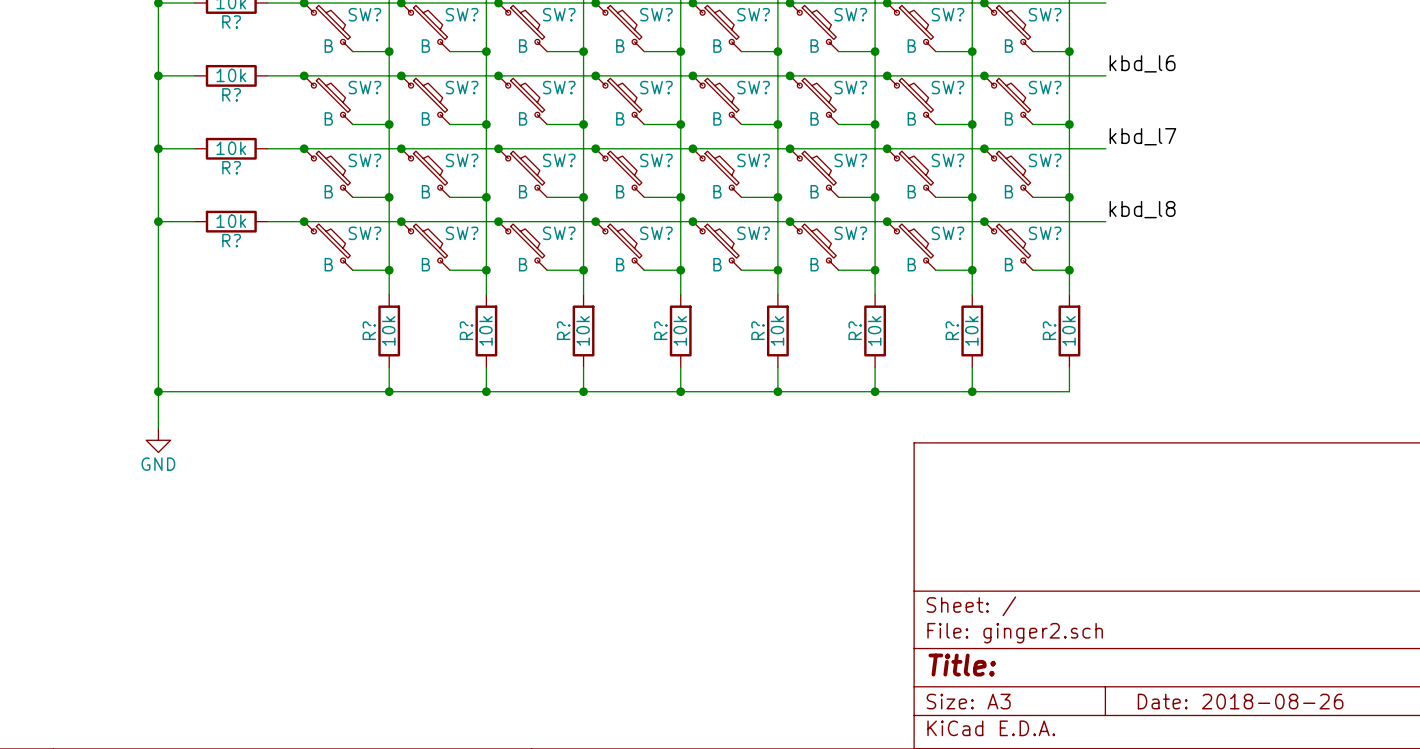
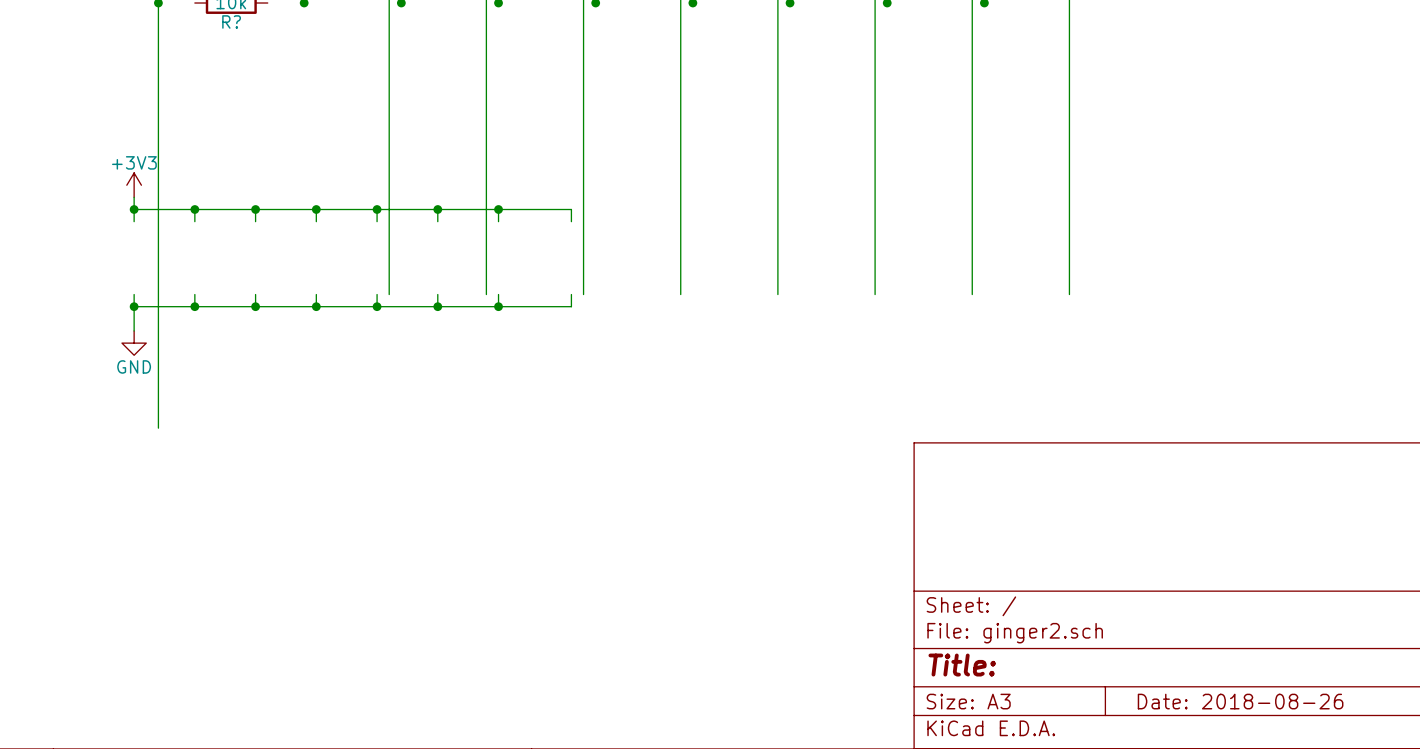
wire: (158, 3) (194, 3) -> none
wire: (267, 3) (1105, 3) -> none
SW?: B (328, 27) -> none
SW?: B (425, 27) -> none
SW?: B (522, 27) -> none
SW?: B (620, 27) -> none
SW?: B (717, 27) -> none
SW?: B (814, 27) -> none
SW?: B (911, 27) -> none
SW?: B (1008, 27) -> none
wire: (352, 51) (389, 51) -> none
junction: (389, 51) -> none
wire: (449, 51) (486, 51) -> none
junction: (486, 51) -> none
wire: (547, 51) (583, 51) -> none
junction: (583, 51) -> none
wire: (644, 51) (680, 51) -> none
junction: (680, 51) -> none
wire: (741, 51) (777, 51) -> none
junction: (777, 51) -> none
wire: (838, 51) (875, 51) -> none
junction: (875, 51) -> none
wire: (935, 51) (972, 51) -> none
junction: (972, 51) -> none
wire: (1032, 51) (1069, 51) -> none
junction: (1069, 51) -> none
label: kbd_l6 (1142, 63) -> none
wire: (158, 75) (194, 75) -> none
junction: (158, 75) -> none
R?: 10k (231, 75) -> none
wire: (267, 75) (1105, 75) -> none
junction: (304, 75) -> none
junction: (401, 75) -> none
junction: (498, 75) -> none
junction: (595, 75) -> none
junction: (692, 75) -> none
junction: (790, 75) -> none
junction: (887, 75) -> none
junction: (984, 75) -> none
SW?: B (328, 100) -> none
SW?: B (425, 100) -> none
SW?: B (522, 100) -> none
SW?: B (620, 100) -> none
SW?: B (717, 100) -> none
SW?: B (814, 100) -> none
SW?: B (911, 100) -> none
SW?: B (1008, 100) -> none
wire: (352, 124) (389, 124) -> none
junction: (389, 124) -> none
wire: (449, 124) (486, 124) -> none
junction: (486, 124) -> none
wire: (547, 124) (583, 124) -> none
junction: (583, 124) -> none
wire: (644, 124) (680, 124) -> none
junction: (680, 124) -> none
wire: (741, 124) (777, 124) -> none
junction: (777, 124) -> none
wire: (838, 124) (875, 124) -> none
junction: (875, 124) -> none
wire: (935, 124) (972, 124) -> none
junction: (972, 124) -> none
wire: (1032, 124) (1069, 124) -> none
junction: (1069, 124) -> none
label: kbd_l7 (1142, 136) -> none
wire: (158, 148) (194, 148) -> none
junction: (158, 148) -> none
R?: 10k (231, 148) -> none
wire: (267, 148) (1105, 148) -> none
junction: (304, 148) -> none
junction: (401, 148) -> none
junction: (498, 148) -> none
junction: (595, 148) -> none
junction: (692, 148) -> none
junction: (790, 148) -> none
junction: (887, 148) -> none
junction: (984, 148) -> none
SW?: B (328, 173) -> none
SW?: B (425, 173) -> none
SW?: B (522, 173) -> none
SW?: B (620, 173) -> none
SW?: B (717, 173) -> none
SW?: B (814, 173) -> none
SW?: B (911, 173) -> none
SW?: B (1008, 173) -> none
power symbol: none -> +3V3 (134, 185)
wire: none -> (134, 197) (134, 221)
wire: (352, 197) (389, 197) -> none
junction: (389, 197) -> none
wire: (449, 197) (486, 197) -> none
junction: (486, 197) -> none
wire: (547, 197) (583, 197) -> none
junction: (583, 197) -> none
wire: (644, 197) (680, 197) -> none
junction: (680, 197) -> none
wire: (741, 197) (777, 197) -> none
junction: (777, 197) -> none
wire: (838, 197) (875, 197) -> none
junction: (875, 197) -> none
wire: (935, 197) (972, 197) -> none
junction: (972, 197) -> none
wire: (1032, 197) (1069, 197) -> none
junction: (1069, 197) -> none
wire: none -> (134, 209) (571, 209) (571, 221)
junction: none -> (134, 209)
junction: none -> (194, 209)
junction: none -> (255, 209)
wire: none -> (316, 209) (316, 221)
wire: none -> (377, 209) (377, 221)
junction: none -> (377, 209)
wire: none -> (437, 209) (437, 221)
junction: none -> (437, 209)
wire: none -> (498, 209) (498, 221)
junction: none -> (498, 209)
label: kbd_l8 (1142, 209) -> none
wire: (158, 221) (194, 221) -> (194, 209) (194, 221)
junction: (158, 221) -> none
R?: 10k (231, 221) -> none
wire: (267, 221) (1105, 221) -> none
junction position: (304, 221) -> (316, 209)
junction: (401, 221) -> none
junction: (498, 221) -> none
junction: (595, 221) -> none
junction: (692, 221) -> none
junction: (790, 221) -> none
junction: (887, 221) -> none
junction: (984, 221) -> none
SW?: B (328, 245) -> none
SW?: B (425, 245) -> none
SW?: B (522, 245) -> none
SW?: B (620, 245) -> none
SW?: B (717, 245) -> none
SW?: B (814, 245) -> none
SW?: B (911, 245) -> none
SW?: B (1008, 245) -> none
wire: (352, 270) (389, 270) -> none
junction: (389, 270) -> none
wire: (449, 270) (486, 270) -> none
junction: (486, 270) -> none
wire: (547, 270) (583, 270) -> none
junction: (583, 270) -> none
wire: (644, 270) (680, 270) -> none
junction: (680, 270) -> none
wire: (741, 270) (777, 270) -> none
junction: (777, 270) -> none
wire: (838, 270) (875, 270) -> none
junction: (875, 270) -> none
wire: (935, 270) (972, 270) -> none
junction: (972, 270) -> none
wire: (1032, 270) (1069, 270) -> none
junction: (1069, 270) -> none
wire: none -> (134, 294) (134, 330)
wire: none -> (194, 294) (194, 306)
wire: none -> (255, 294) (255, 306)
wire: none -> (316, 294) (316, 306)
wire: none -> (377, 294) (377, 306)
wire: none -> (437, 294) (437, 306)
wire: none -> (498, 294) (498, 306)
wire: none -> (571, 294) (571, 306) (134, 306)
junction: none -> (134, 306)
junction: none -> (194, 306)
junction: none -> (255, 306)
junction: none -> (316, 306)
junction: none -> (377, 306)
junction: none -> (437, 306)
junction: none -> (498, 306)
R?: 10k (389, 330) -> none
R?: 10k (486, 330) -> none
R?: 10k (583, 330) -> none
R?: 10k (680, 330) -> none
R?: 10k (777, 330) -> none
R?: 10k (875, 330) -> none
R?: 10k (972, 330) -> none
R?: 10k (1069, 330) -> none
wire: (389, 367) (389, 391) -> none
wire: (486, 367) (486, 391) -> none
wire: (583, 367) (583, 391) -> none
wire: (680, 367) (680, 391) -> none
wire: (777, 367) (777, 391) -> none
wire: (875, 367) (875, 391) -> none
wire: (972, 367) (972, 391) -> none
wire: (1069, 367) (1069, 391) (158, 391) -> none
junction: (158, 391) -> none
junction: (389, 391) -> none
junction: (486, 391) -> none
junction: (583, 391) -> none
junction: (680, 391) -> none
junction: (777, 391) -> none
junction: (875, 391) -> none
junction: (972, 391) -> none
power symbol position: GND (158, 440) -> GND (134, 343)

